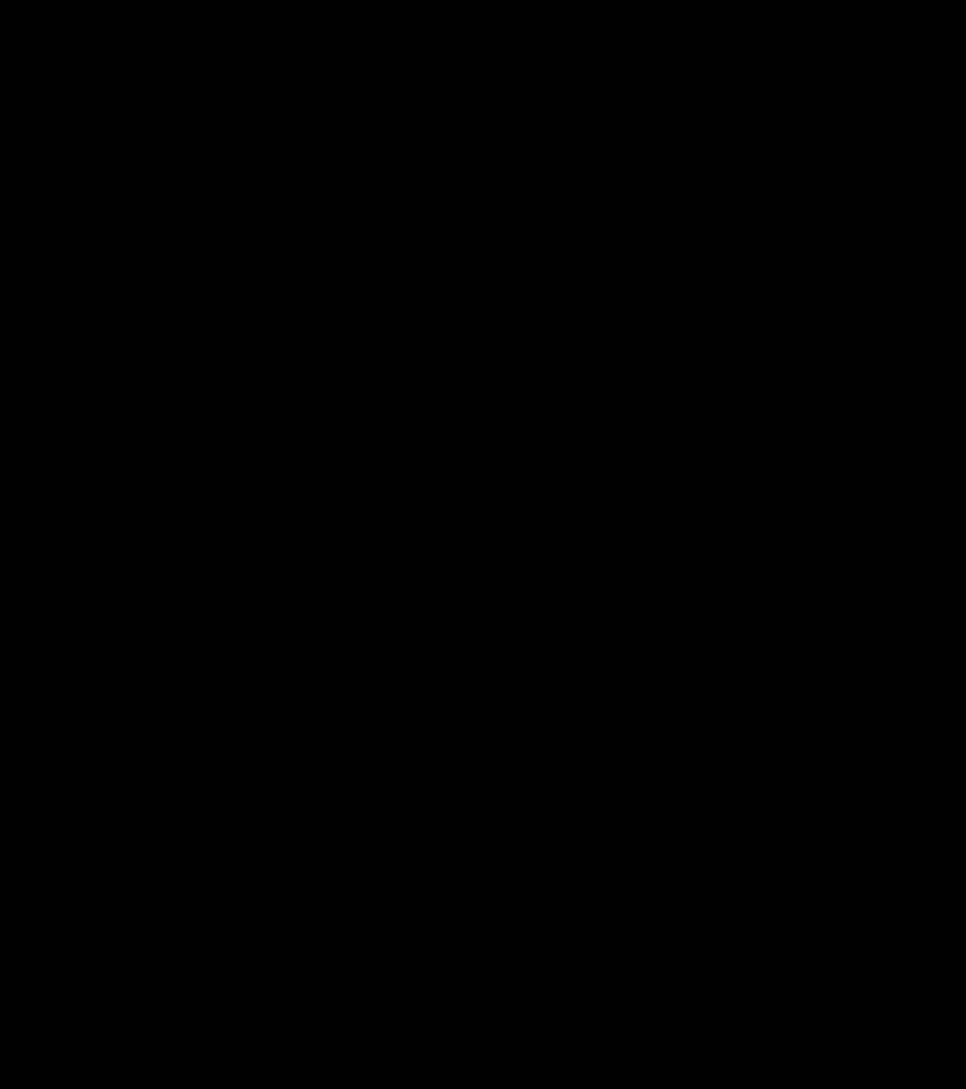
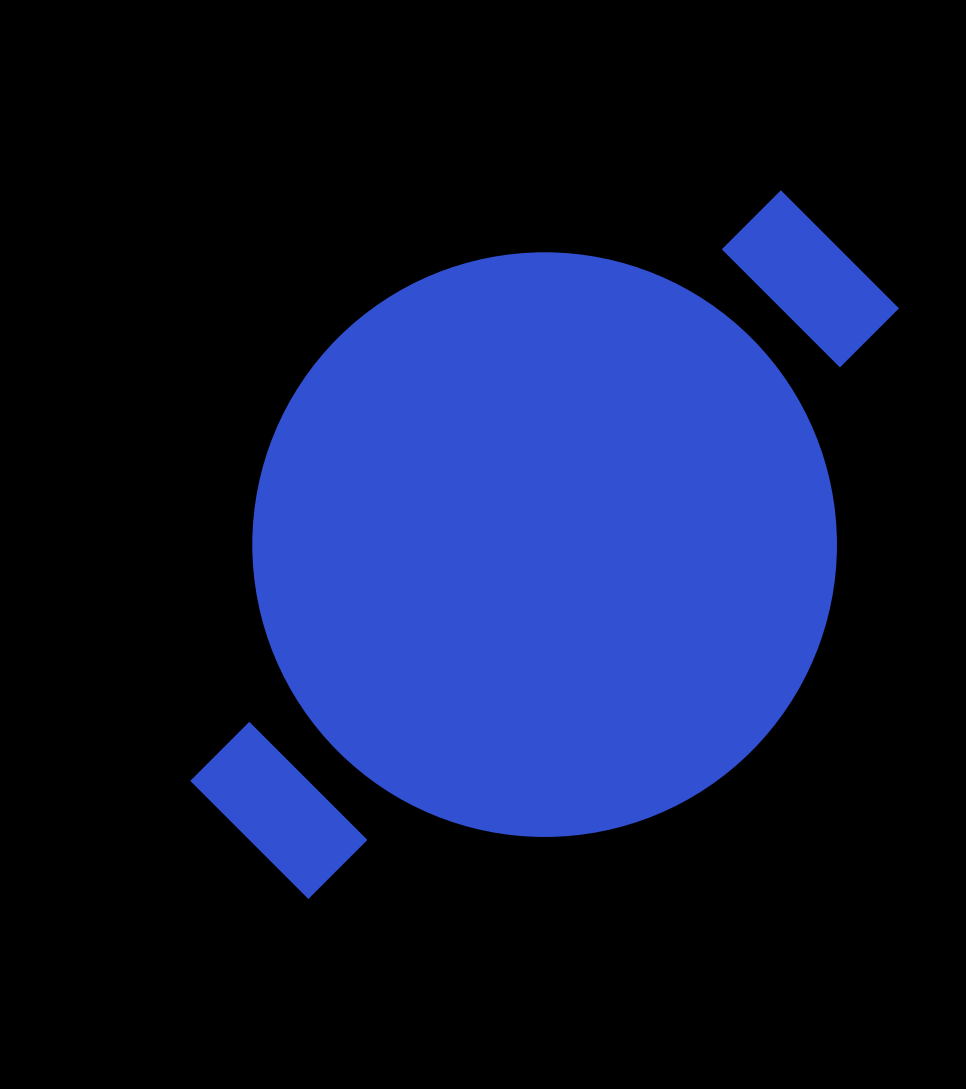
part: none -> (544, 544)

